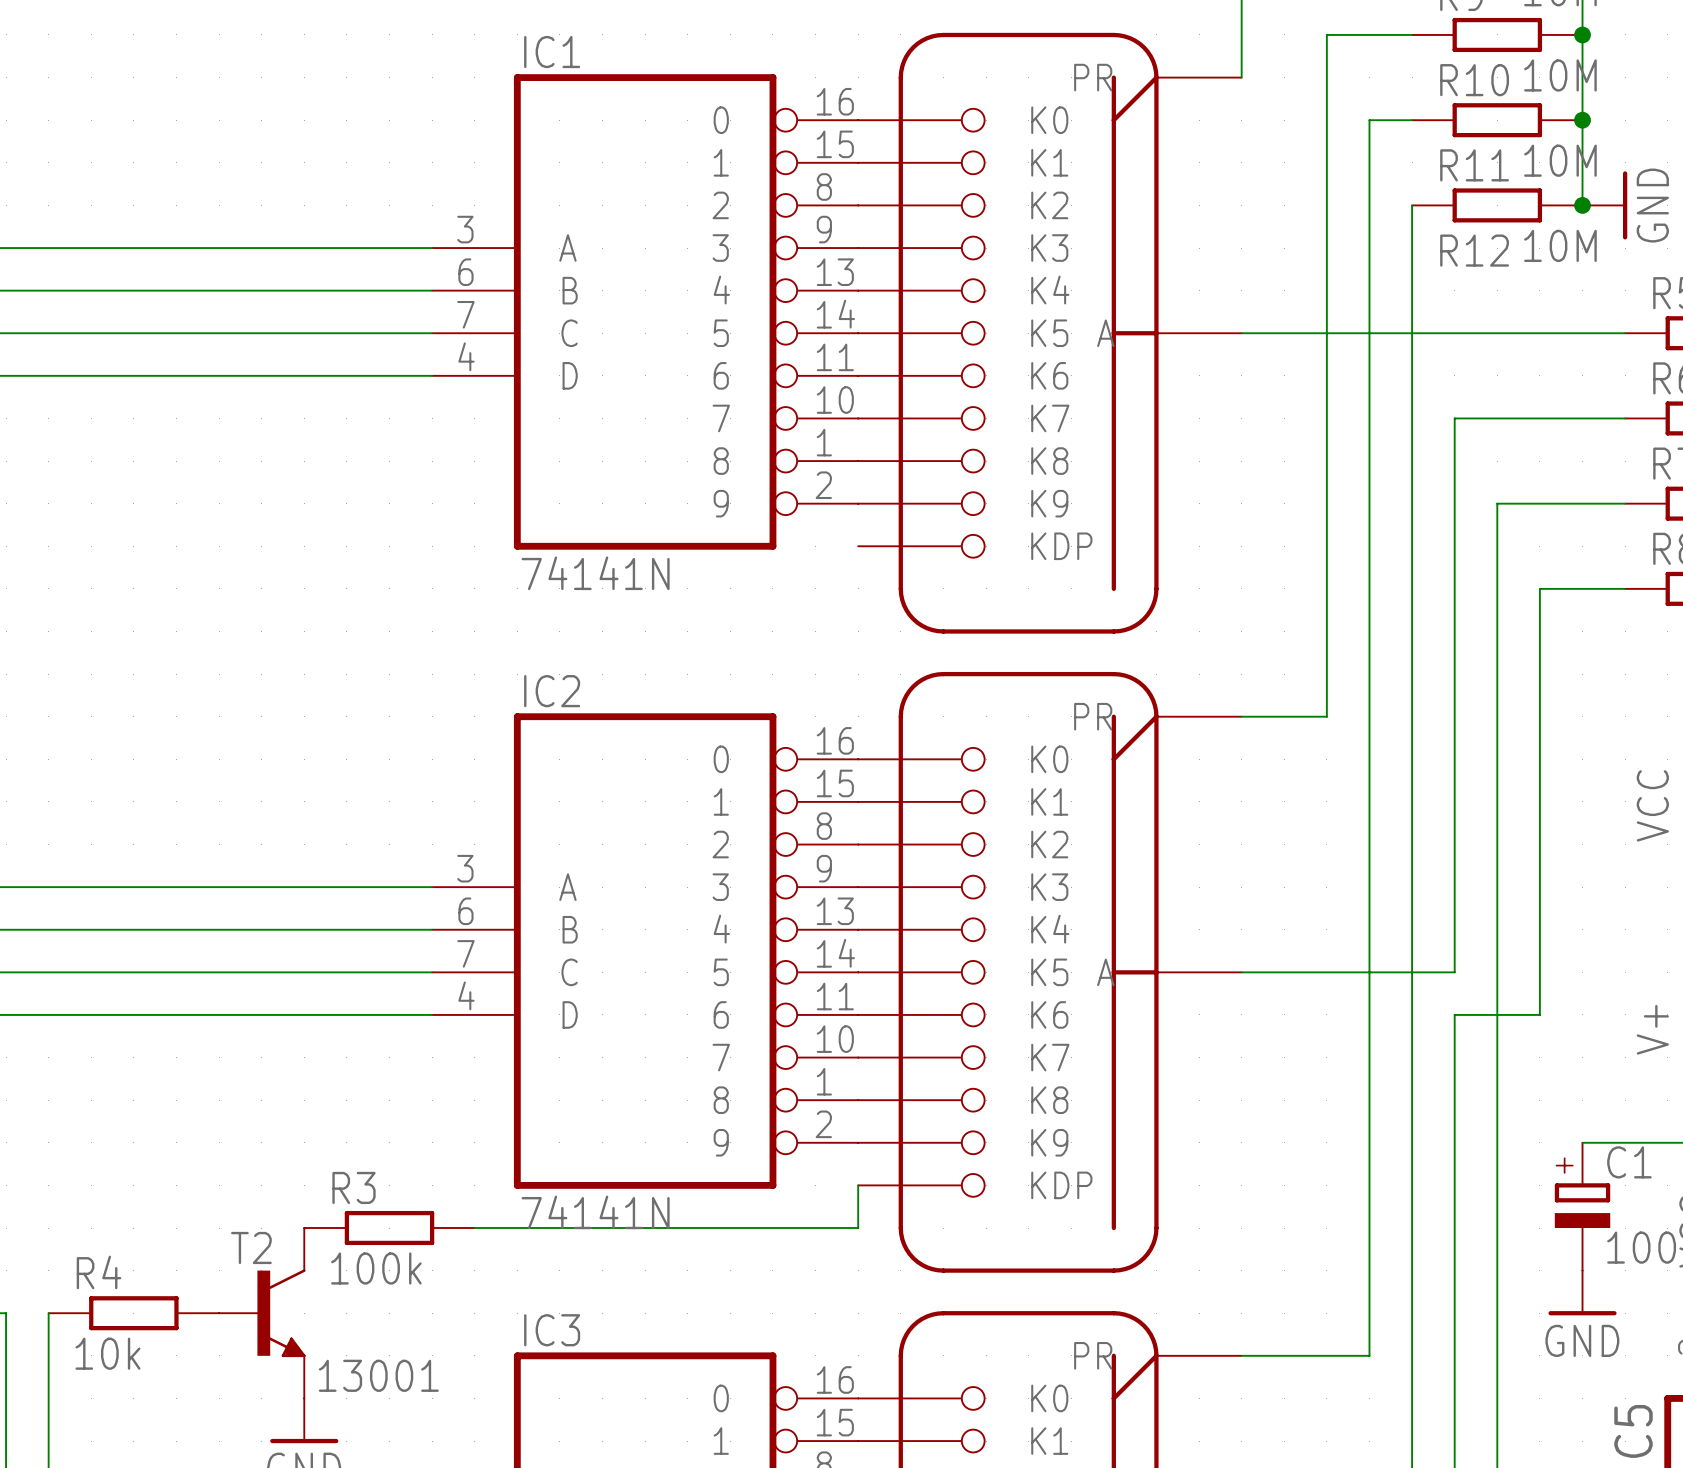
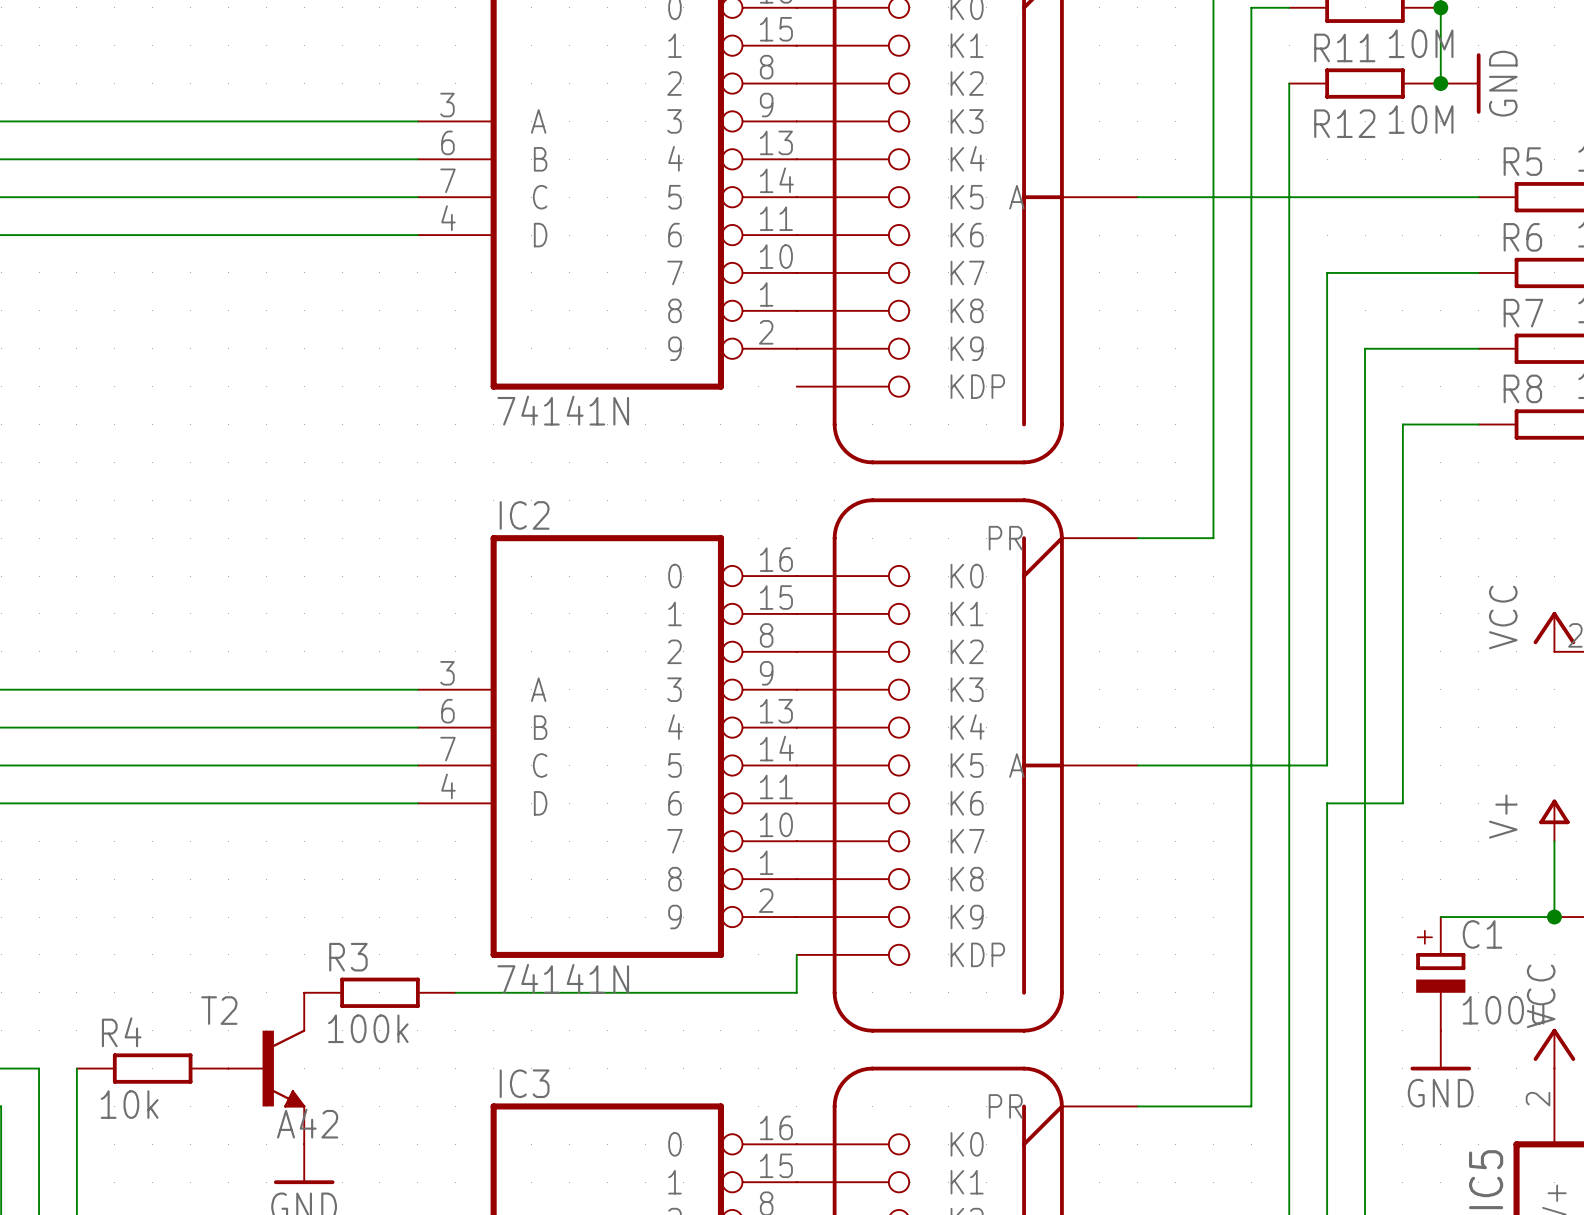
T2 name position: T2 (251, 1247) -> T2 (219, 1010)
T2 value: 13001 (378, 1375) -> A42 (307, 1123)

